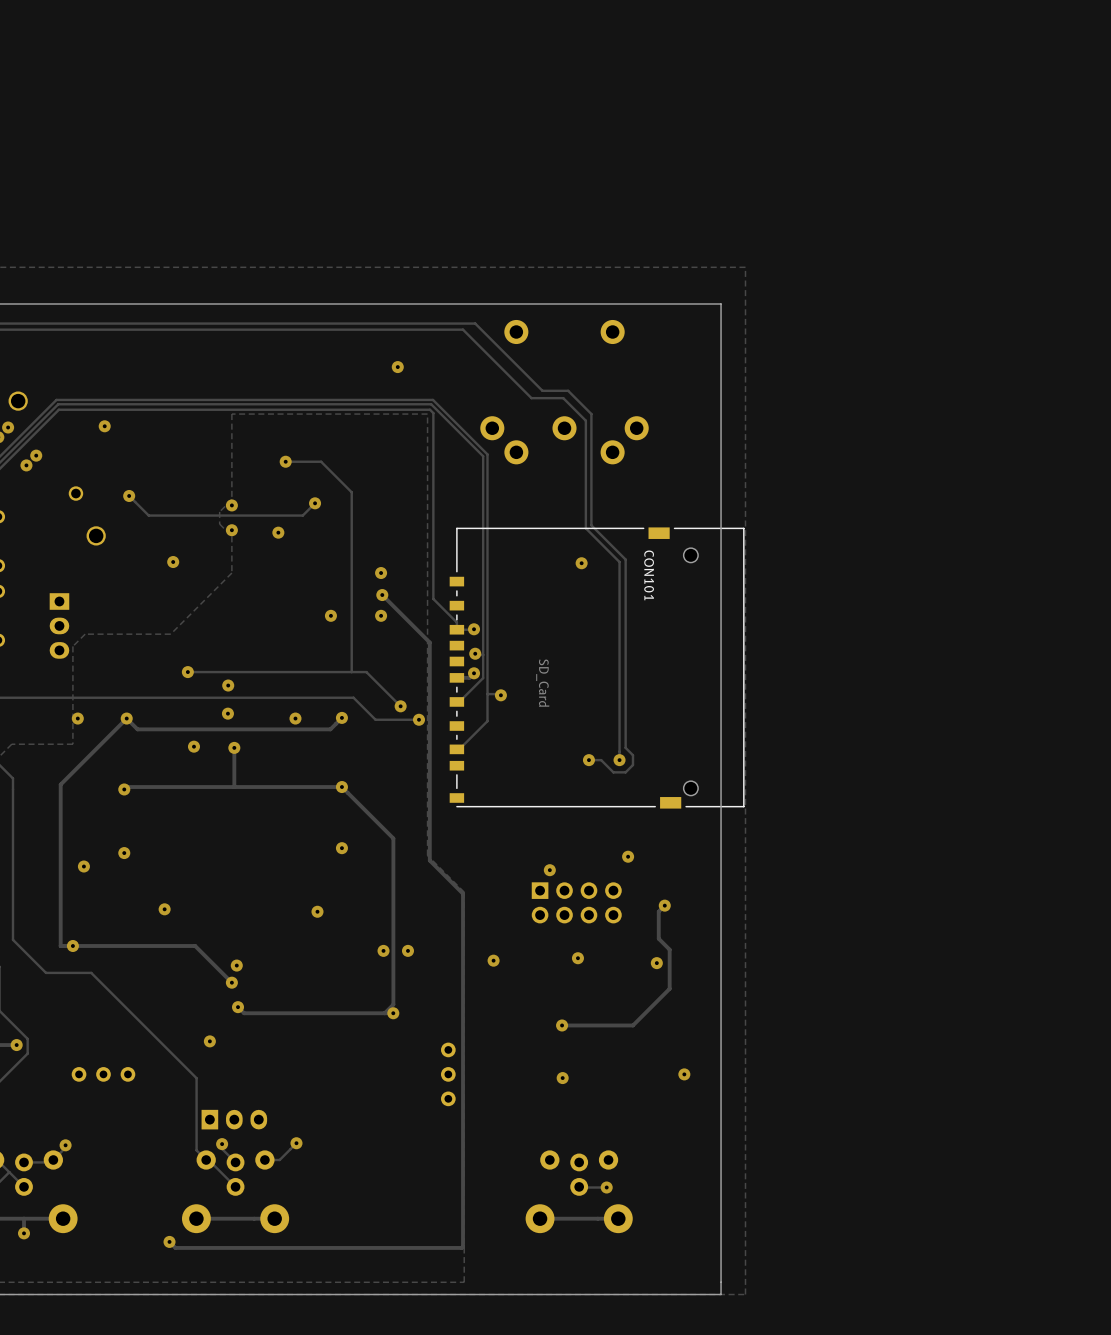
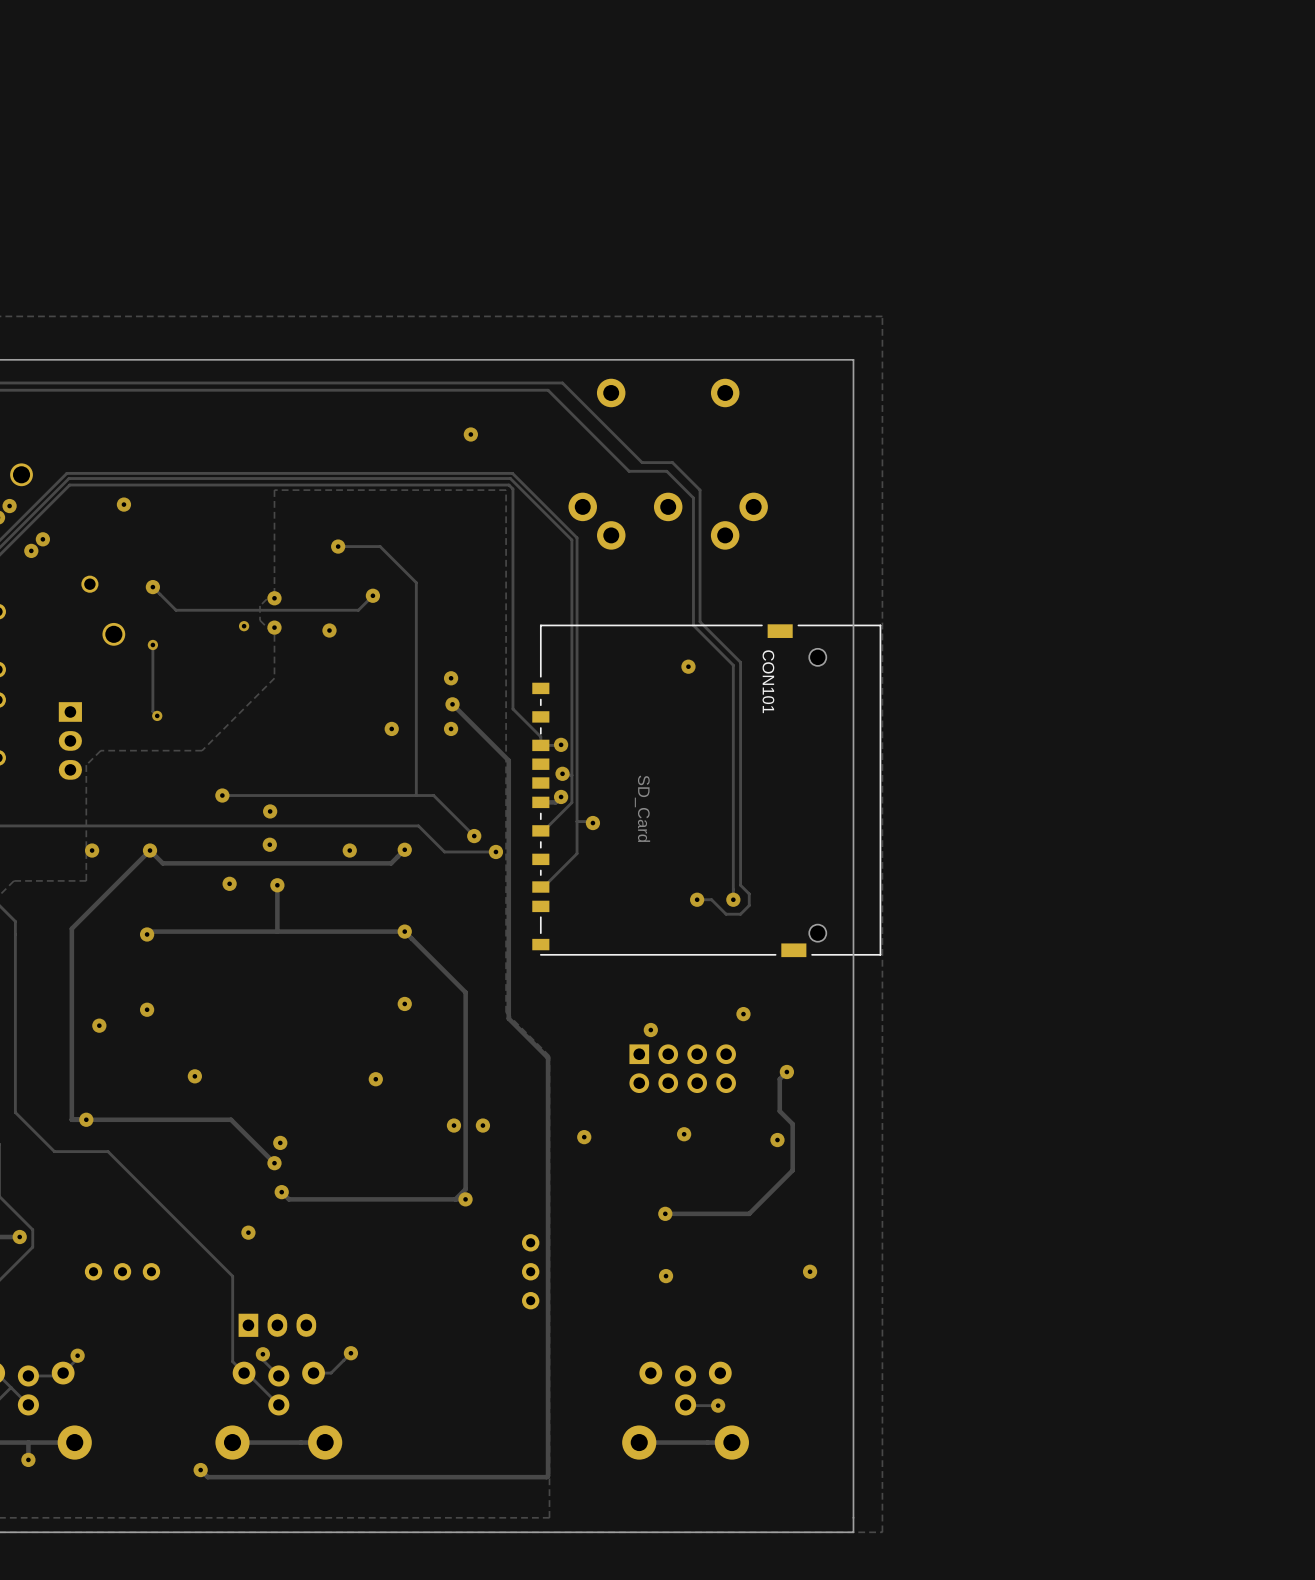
via: none -> (244, 626)
track: none -> (152, 644) (152, 711) (157, 715)
via: none -> (152, 644)
via: (173, 562) -> none
via: none -> (157, 715)

